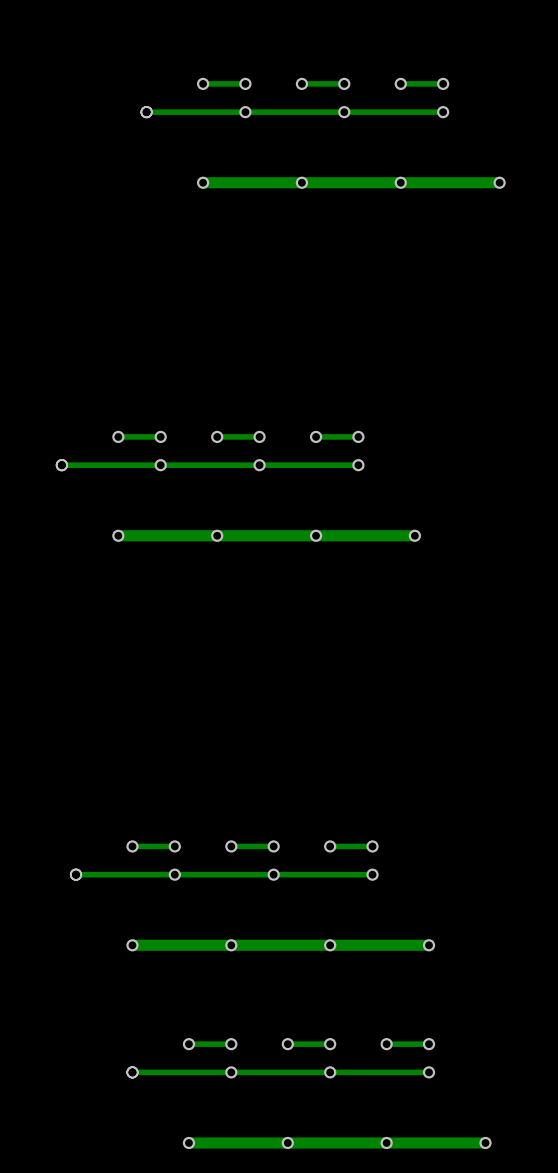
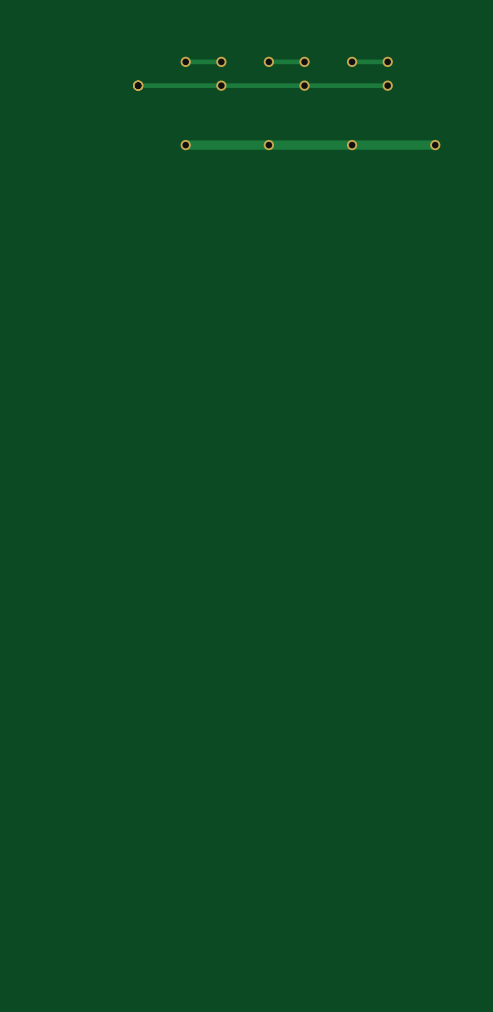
via: (118, 436) -> none
track: (160, 436) (118, 436) -> none
via: (160, 436) -> none
via: (217, 436) -> none
track: (259, 436) (217, 436) -> none
via: (259, 436) -> none
via: (316, 436) -> none
track: (358, 436) (316, 436) -> none
via: (358, 436) -> none
via: (61, 465) -> none
via: (160, 465) -> none
via: (259, 465) -> none
track: (358, 465) (61, 465) -> none
via: (358, 465) -> none
via: (118, 535) -> none
via: (217, 535) -> none
via: (316, 535) -> none
track: (414, 535) (118, 535) -> none
via: (414, 535) -> none
via: (132, 846) -> none
track: (174, 846) (132, 846) -> none
via: (174, 846) -> none
via: (231, 846) -> none
track: (273, 846) (231, 846) -> none
via: (273, 846) -> none
via: (330, 846) -> none
track: (372, 846) (330, 846) -> none
via: (372, 846) -> none
via: (75, 874) -> none
via: (174, 874) -> none
via: (273, 874) -> none
track: (372, 874) (75, 874) -> none
via: (372, 874) -> none
via: (132, 945) -> none
via: (231, 945) -> none
via: (330, 945) -> none
track: (429, 945) (132, 945) -> none
via: (429, 945) -> none
via: (188, 1044) -> none
track: (231, 1044) (188, 1044) -> none
via: (231, 1044) -> none
via: (287, 1044) -> none
track: (330, 1044) (287, 1044) -> none
via: (330, 1044) -> none
via: (386, 1044) -> none
track: (429, 1044) (386, 1044) -> none
via: (429, 1044) -> none
via: (132, 1072) -> none
via: (231, 1072) -> none
via: (330, 1072) -> none
track: (429, 1072) (132, 1072) -> none
via: (429, 1072) -> none
via: (188, 1142) -> none
via: (287, 1142) -> none
via: (386, 1142) -> none
track: (485, 1142) (188, 1142) -> none
via: (485, 1142) -> none

